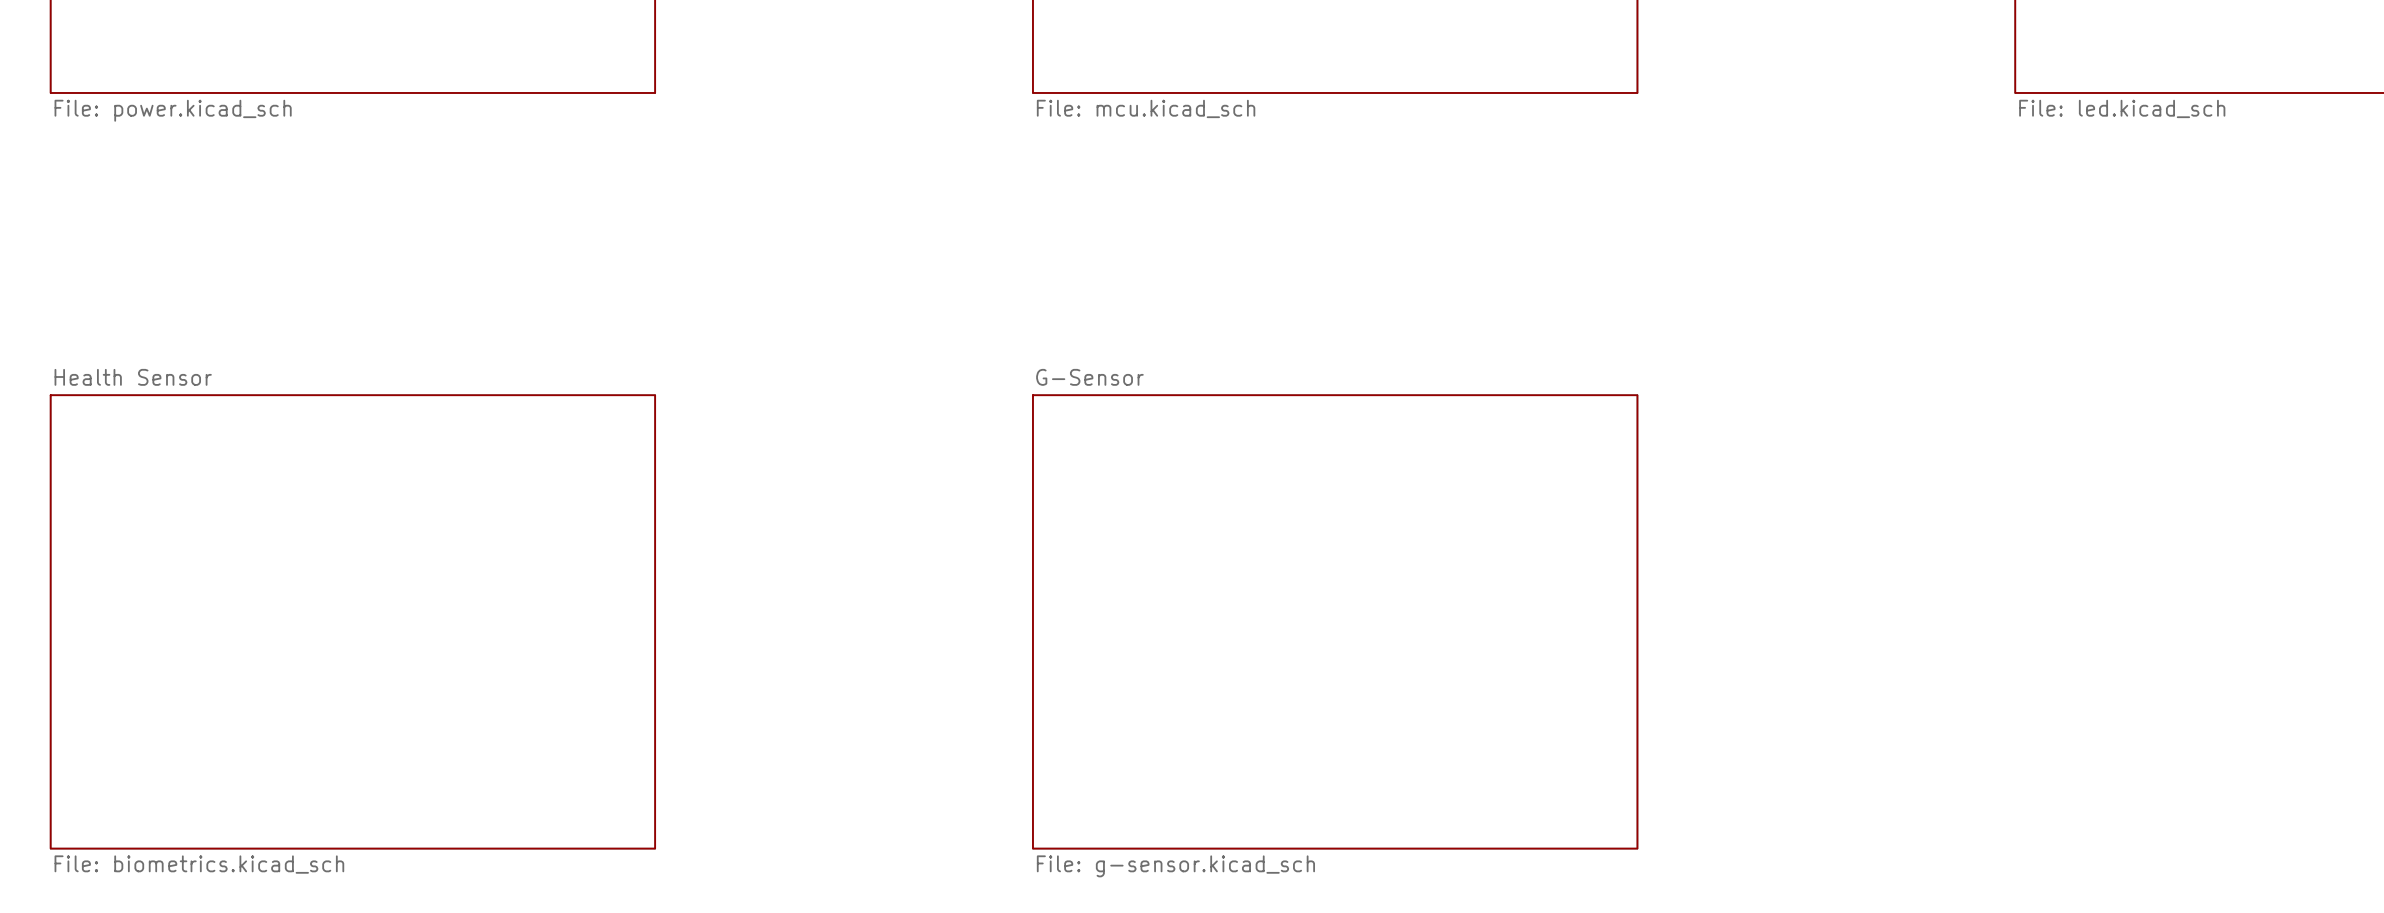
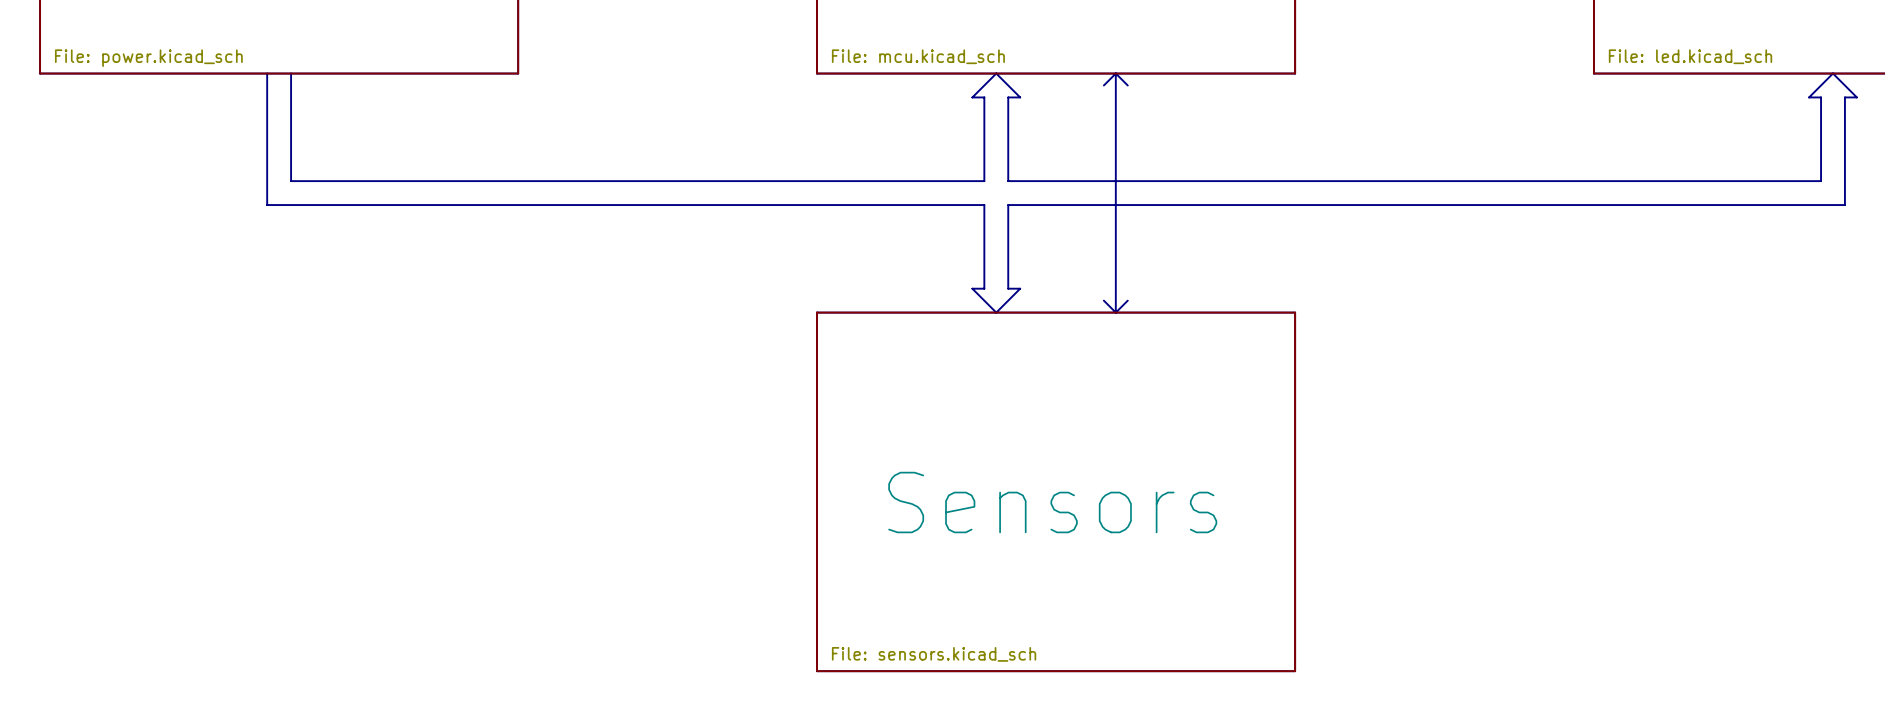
line: none -> (267, 73) (267, 205) (984, 205) (984, 288) (972, 288) (996, 312) (1020, 288) (1008, 288) (1008, 205) (1844, 205) (1844, 97) (1856, 97) (1832, 73) (1809, 97) (1821, 97) (1821, 181) (1008, 181) (1008, 97) (1020, 97) (996, 73) (972, 97) (984, 97) (984, 181) (291, 181) (291, 73)
line: none -> (1115, 73) (1127, 85)
line: none -> (1115, 73) (1103, 85)
line: none -> (1115, 73) (1115, 312)
sheet value position: File: mcu.kicad_sch (1146, 108) -> File: mcu.kicad_sch (918, 56)
sheet value position: File: led.kicad_sch (2122, 108) -> File: led.kicad_sch (1690, 56)
sheet value position: File: power.kicad_sch (173, 110) -> File: power.kicad_sch (148, 58)
sheet G-Sensor name: G-Sensor (1089, 377) -> Sensors (1052, 502)
line: none -> (1103, 300) (1115, 312)
line: none -> (1127, 300) (1115, 312)
sheet Health Sensor: File: biometrics.kicad_sch (352, 621) -> none
sheet G-Sensor value: File: g-sensor.kicad_sch (1175, 866) -> File: sensors.kicad_sch (934, 654)

